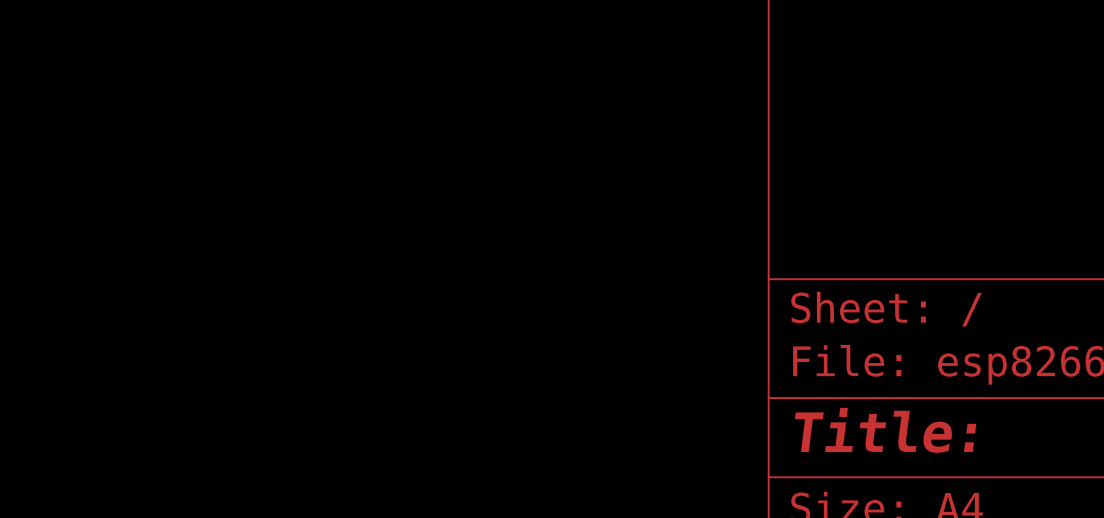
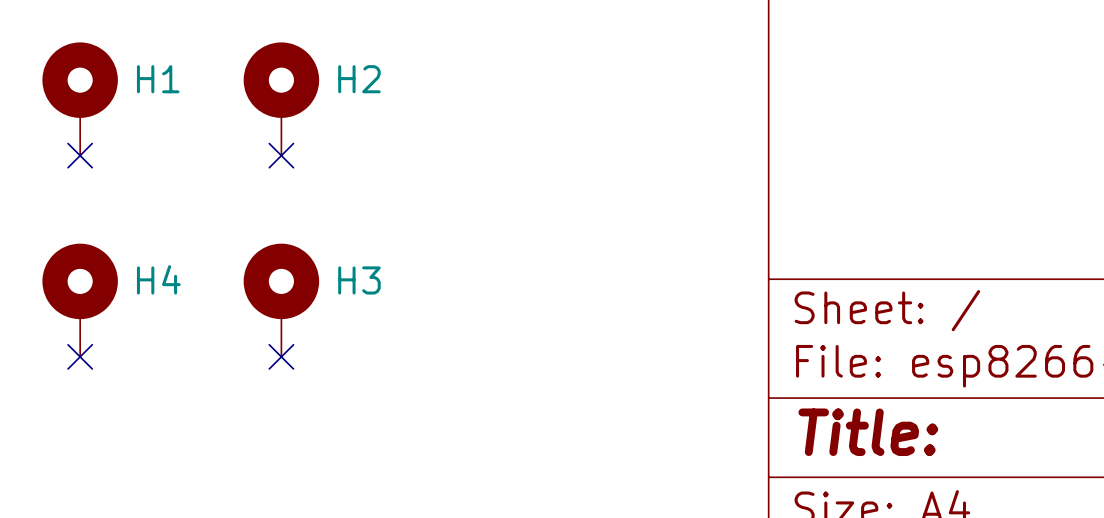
H1: none -> (80, 99)
H2: none -> (281, 99)
no-connect mark: none -> (80, 155)
no-connect mark: none -> (281, 155)
H4: none -> (80, 300)
H3: none -> (281, 300)
no-connect mark: none -> (80, 356)
no-connect mark: none -> (281, 356)

